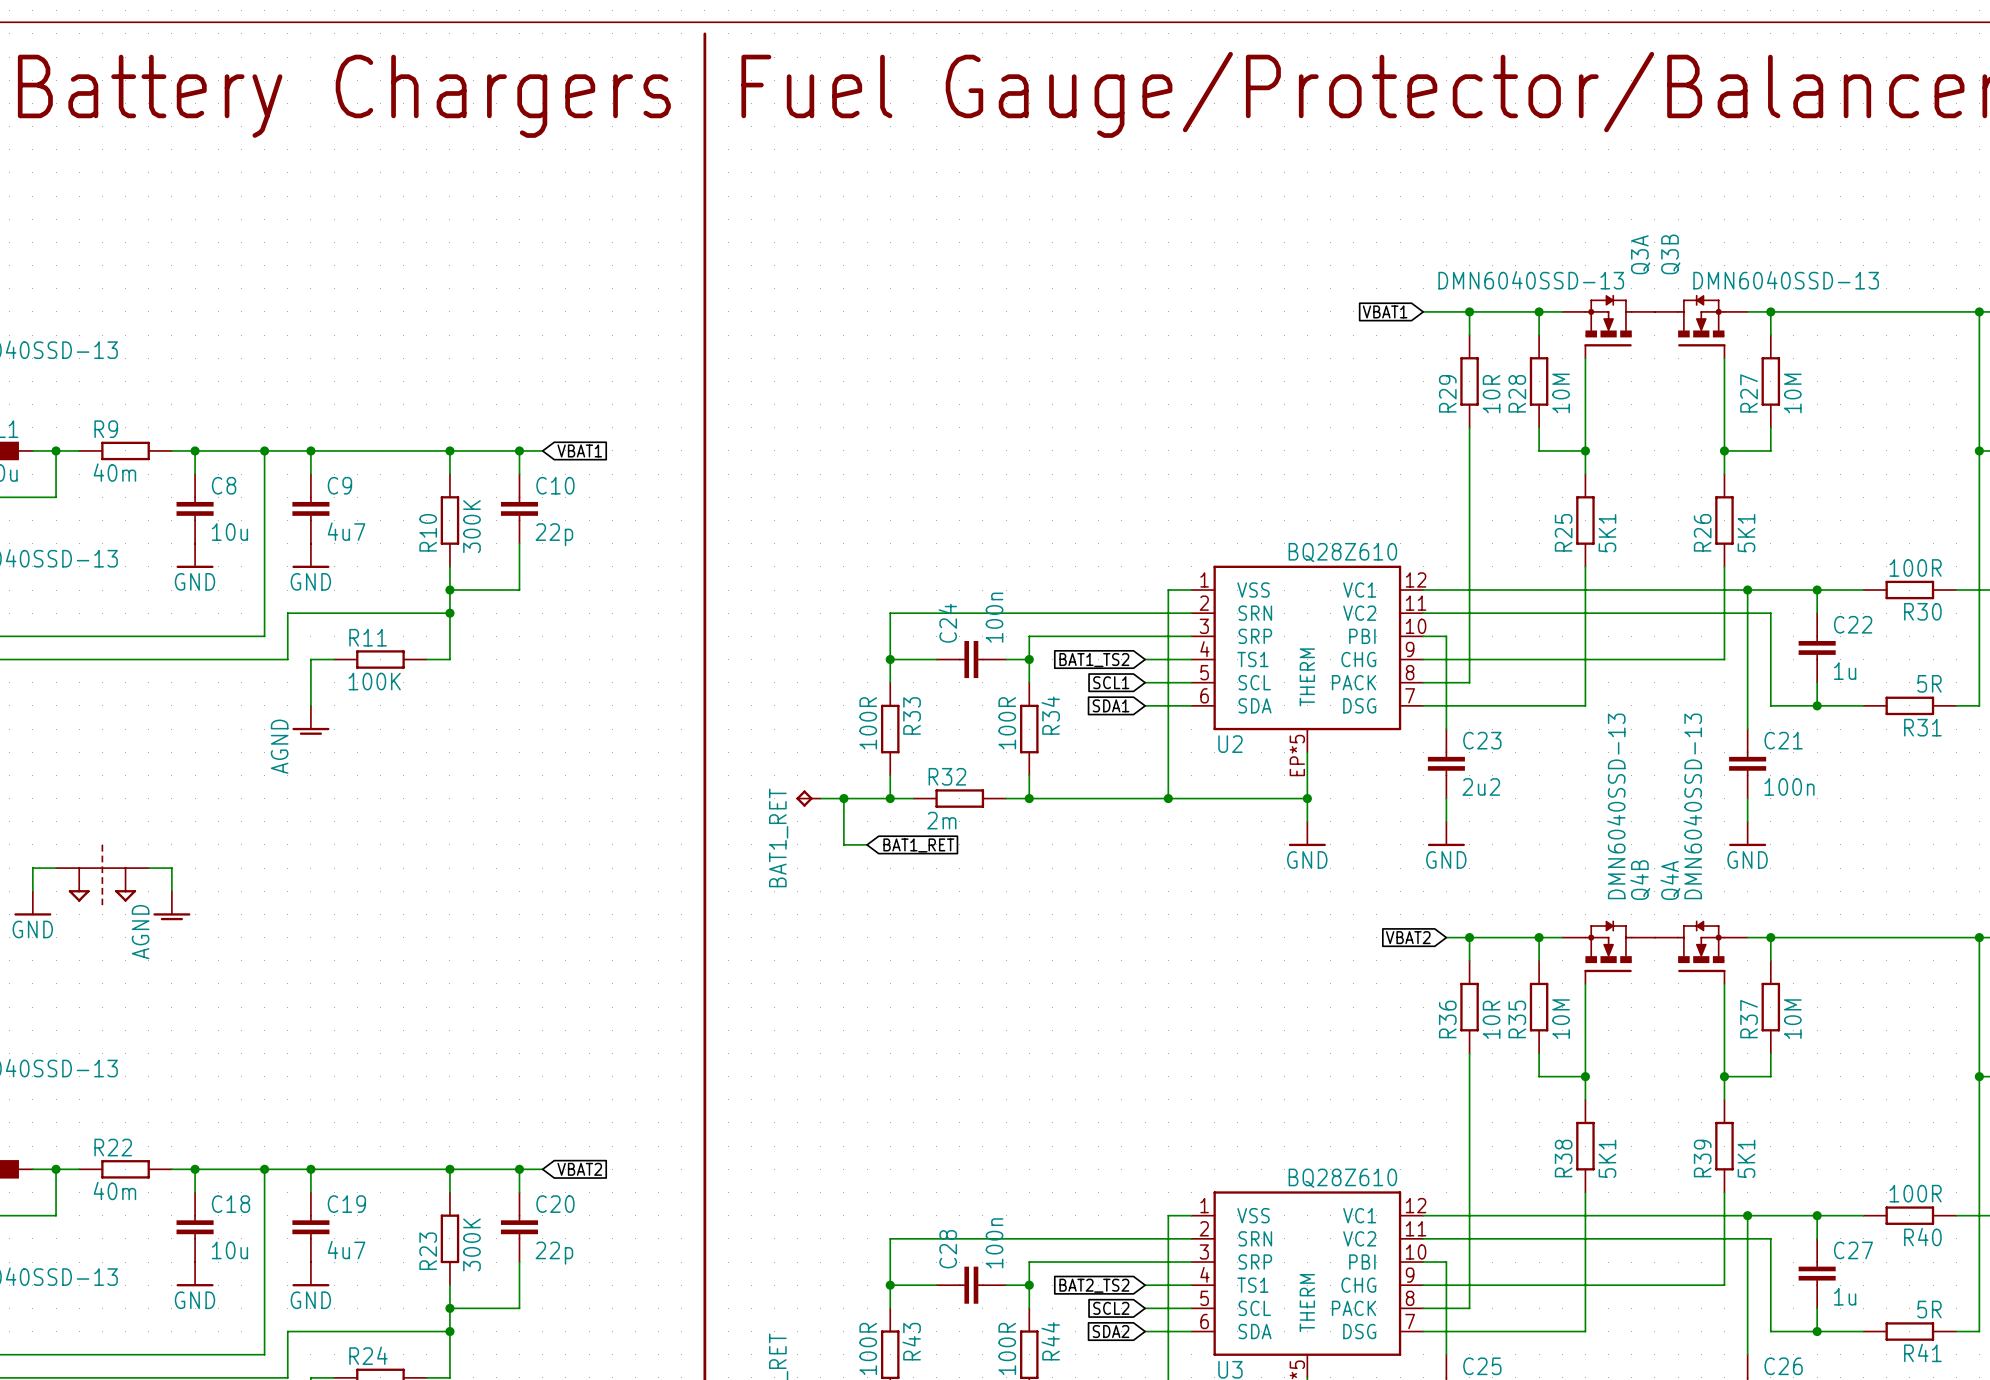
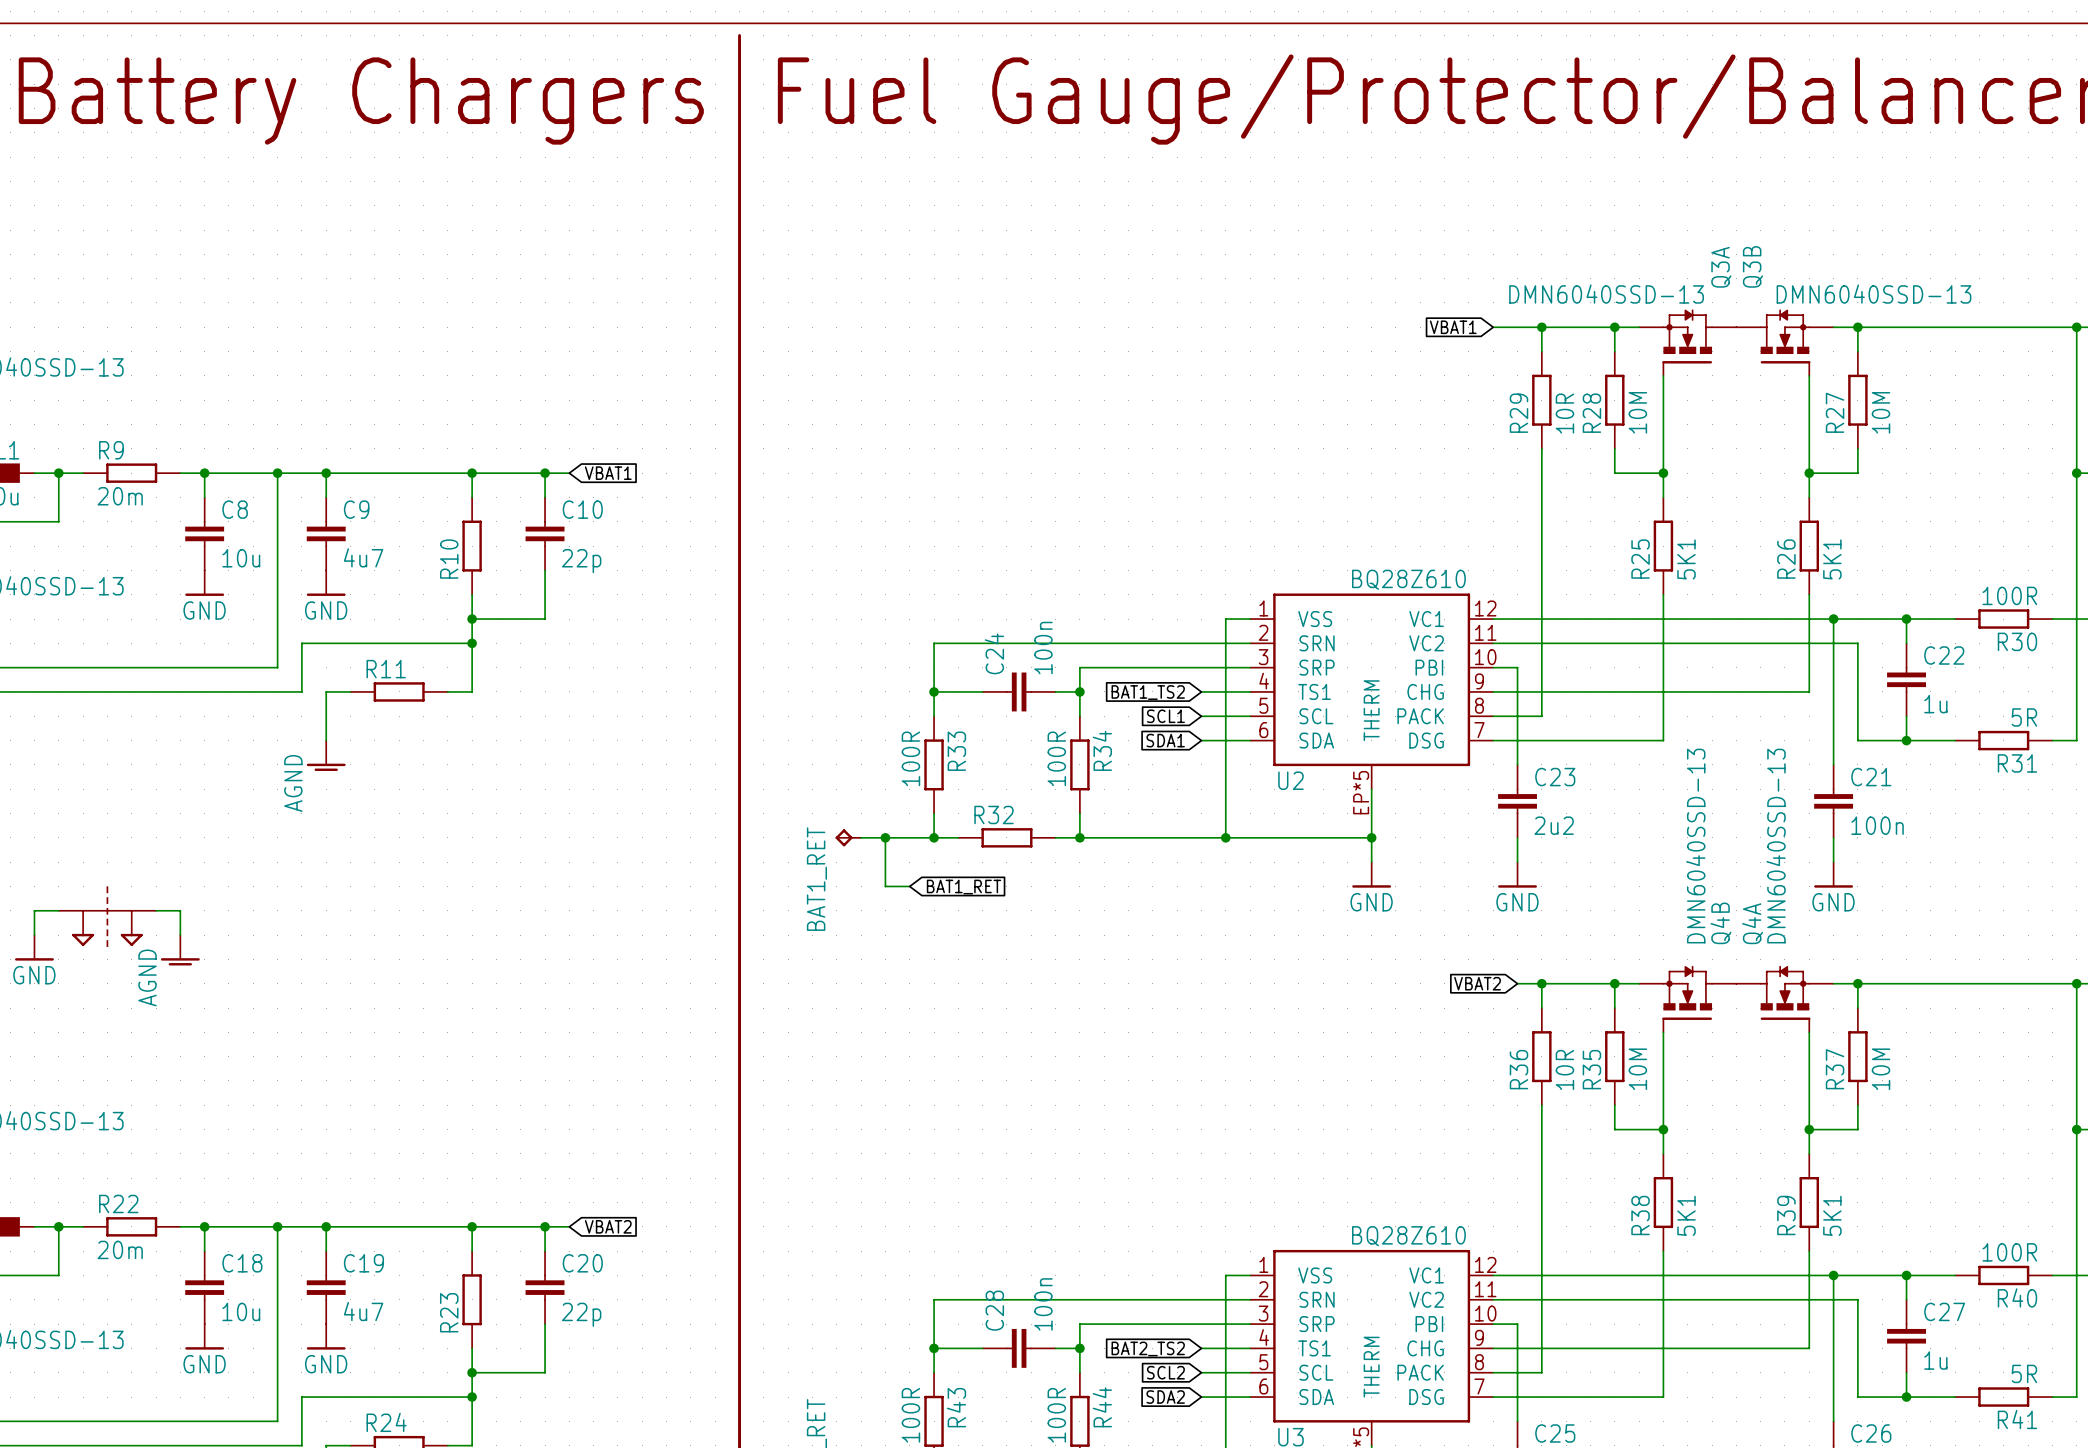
R9 value: 40m (114, 472) -> 20m (120, 496)
R10 value: 300K (471, 526) -> none
R11 value: 100K (374, 681) -> none
R32 value: 2m (941, 820) -> none
R22 value: 40m (114, 1190) -> 20m (120, 1249)
R23 value: 300K (471, 1244) -> none

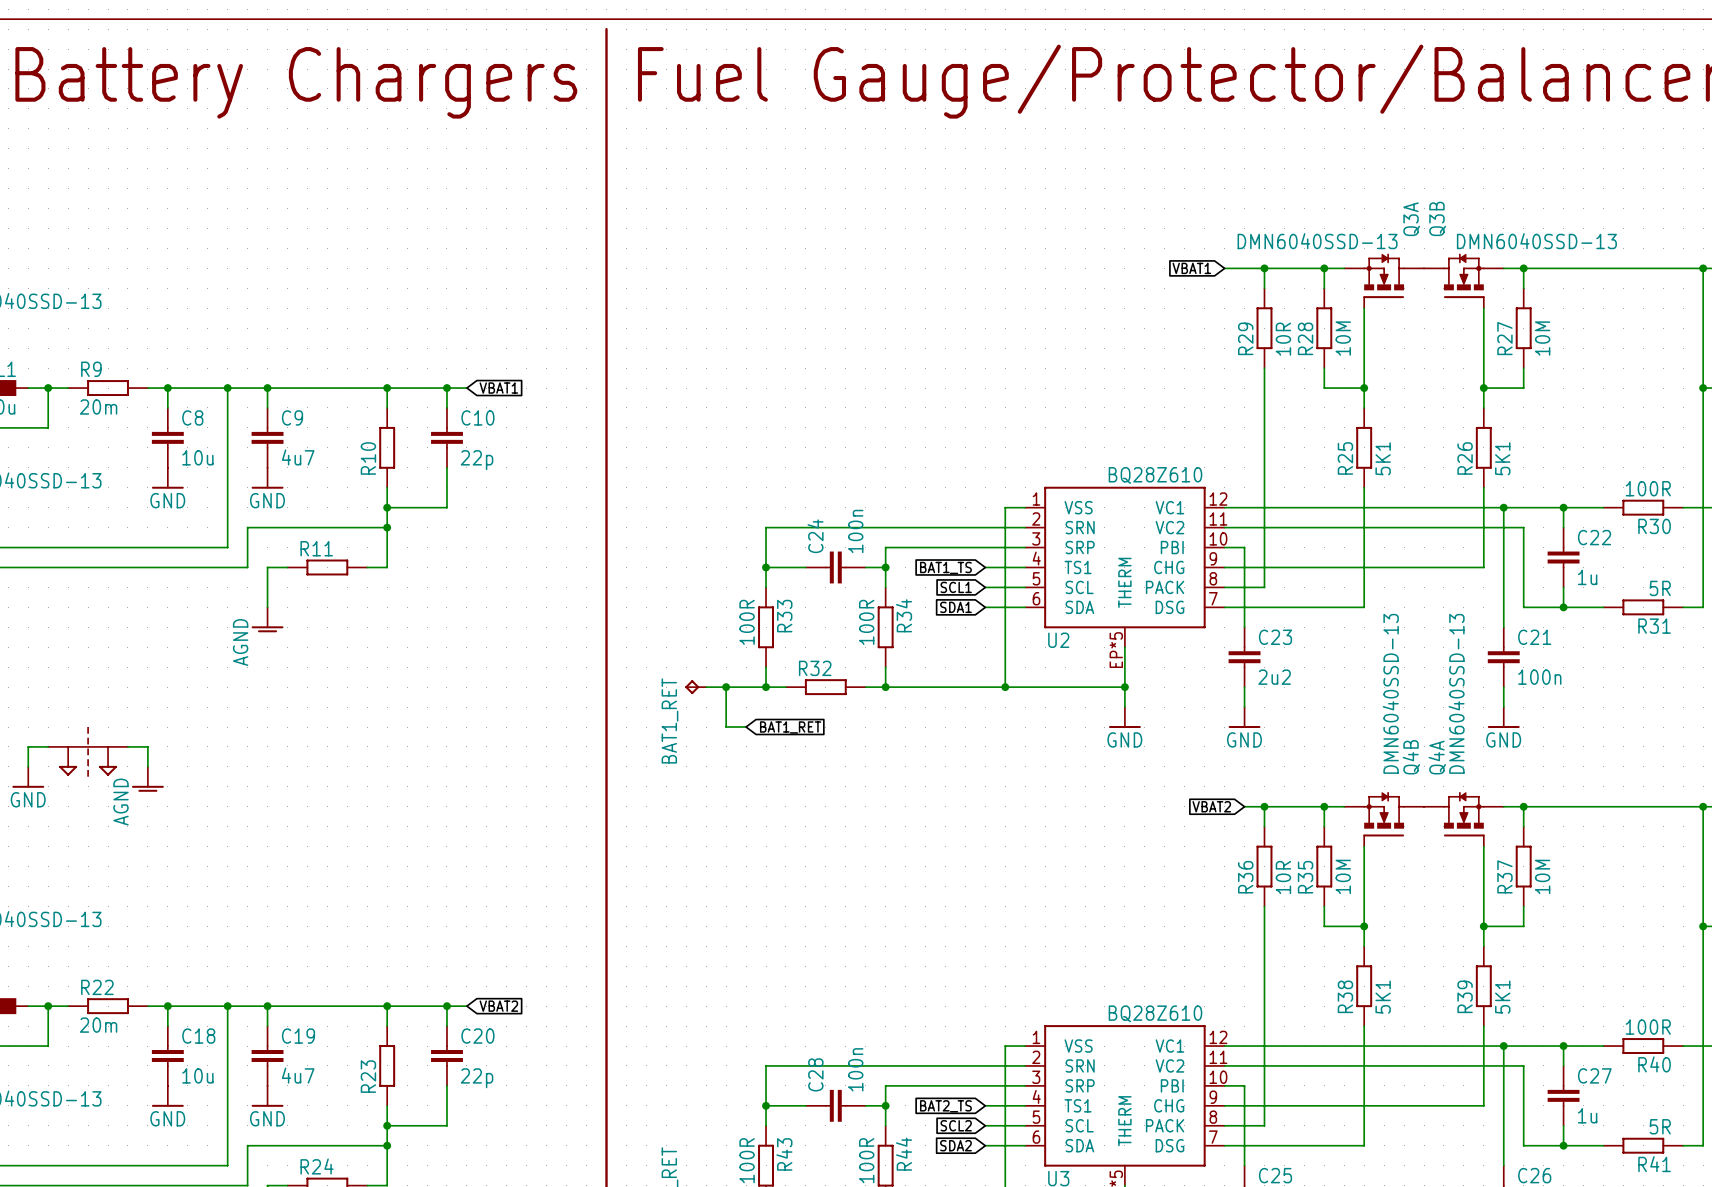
global label: BAT1_TS2 (1148, 692) -> BAT1_TS (945, 567)
global label: BAT2_TS2 (1148, 1348) -> BAT2_TS (945, 1106)

